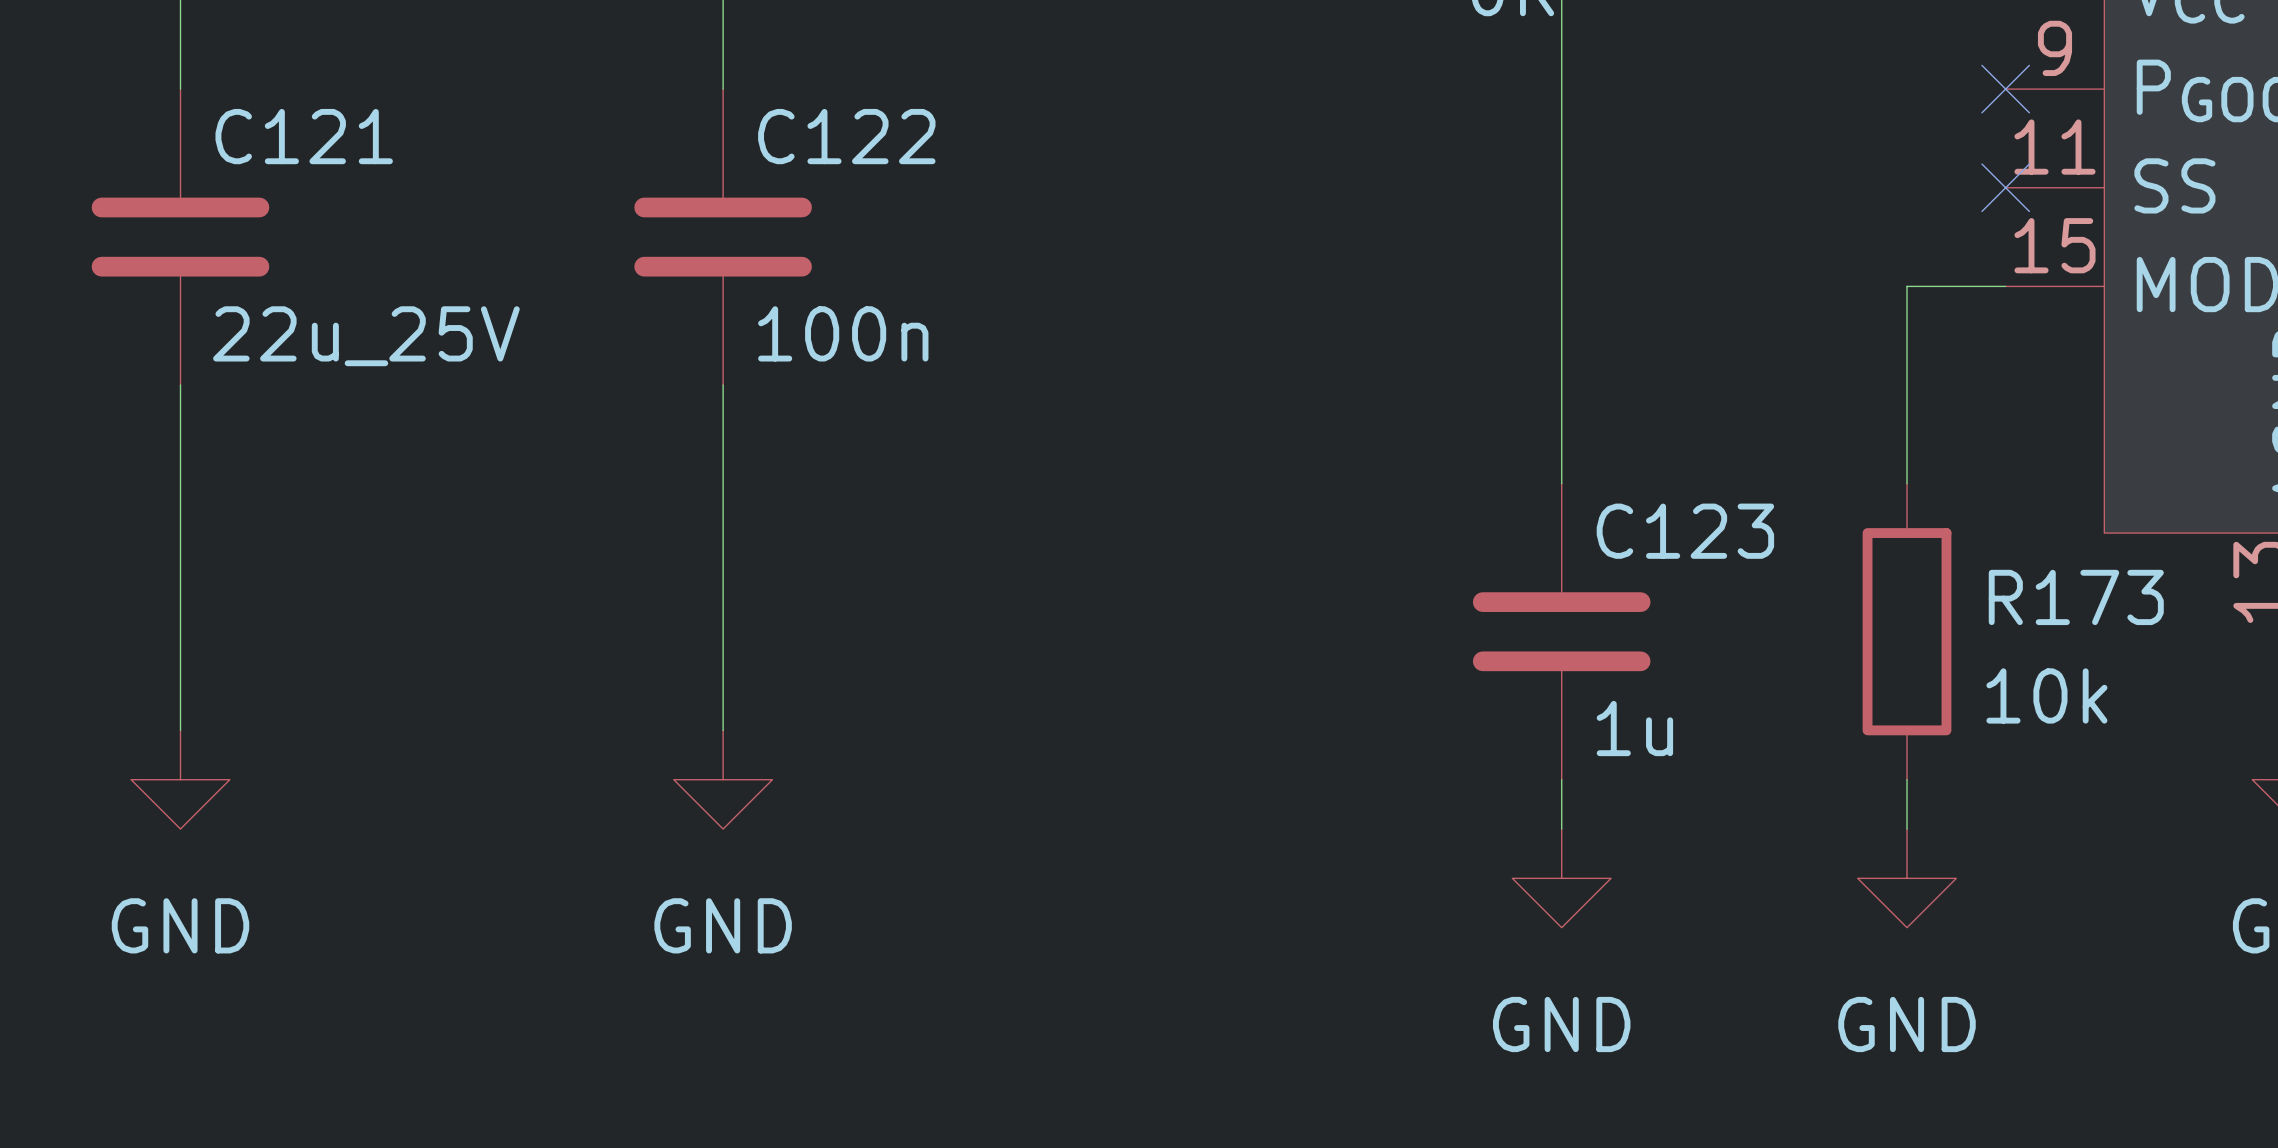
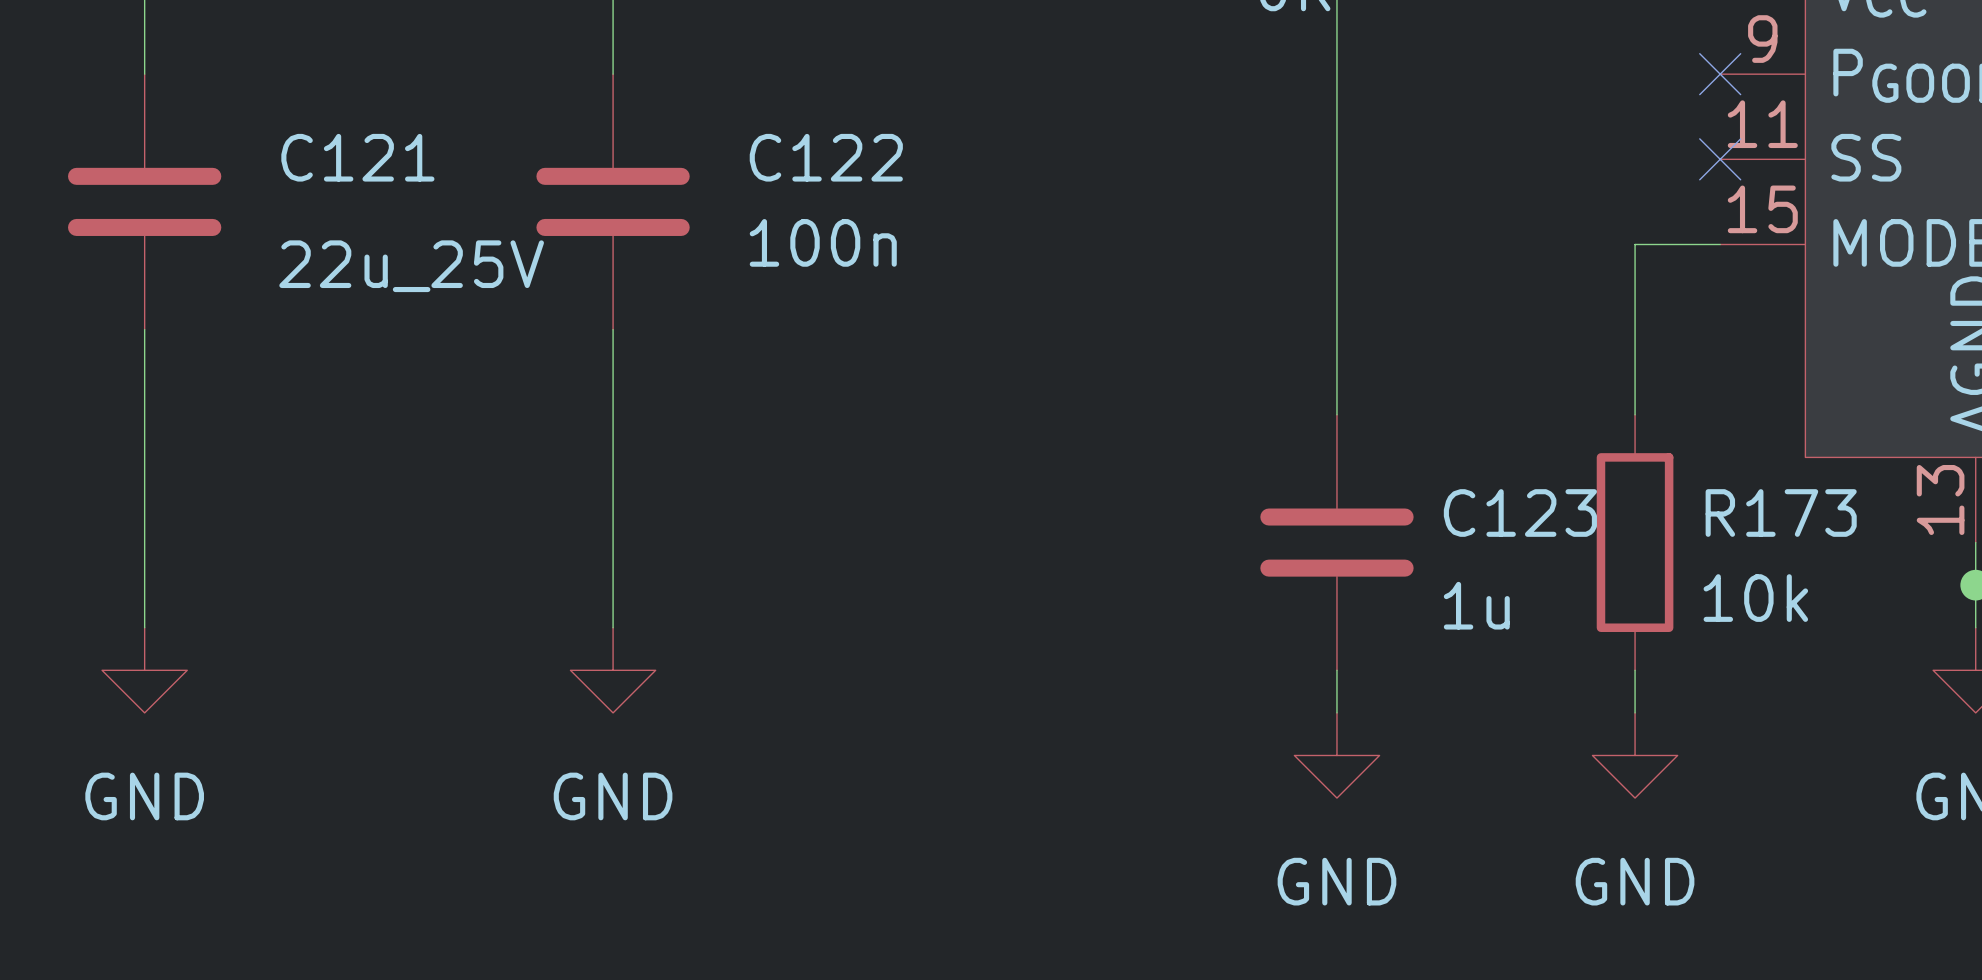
C121 name position: C121 (304, 136) -> C121 (357, 157)
C122 name position: C122 (846, 136) -> C122 (826, 157)
C122 text position: 100n (843, 333) -> 100n (823, 242)
C121 text position: 22u_25V (366, 336) -> 22u_25V (411, 266)
C123 name position: C123 (1685, 531) -> C123 (1520, 512)
C123 text position: 1u (1634, 728) -> 1u (1476, 605)

